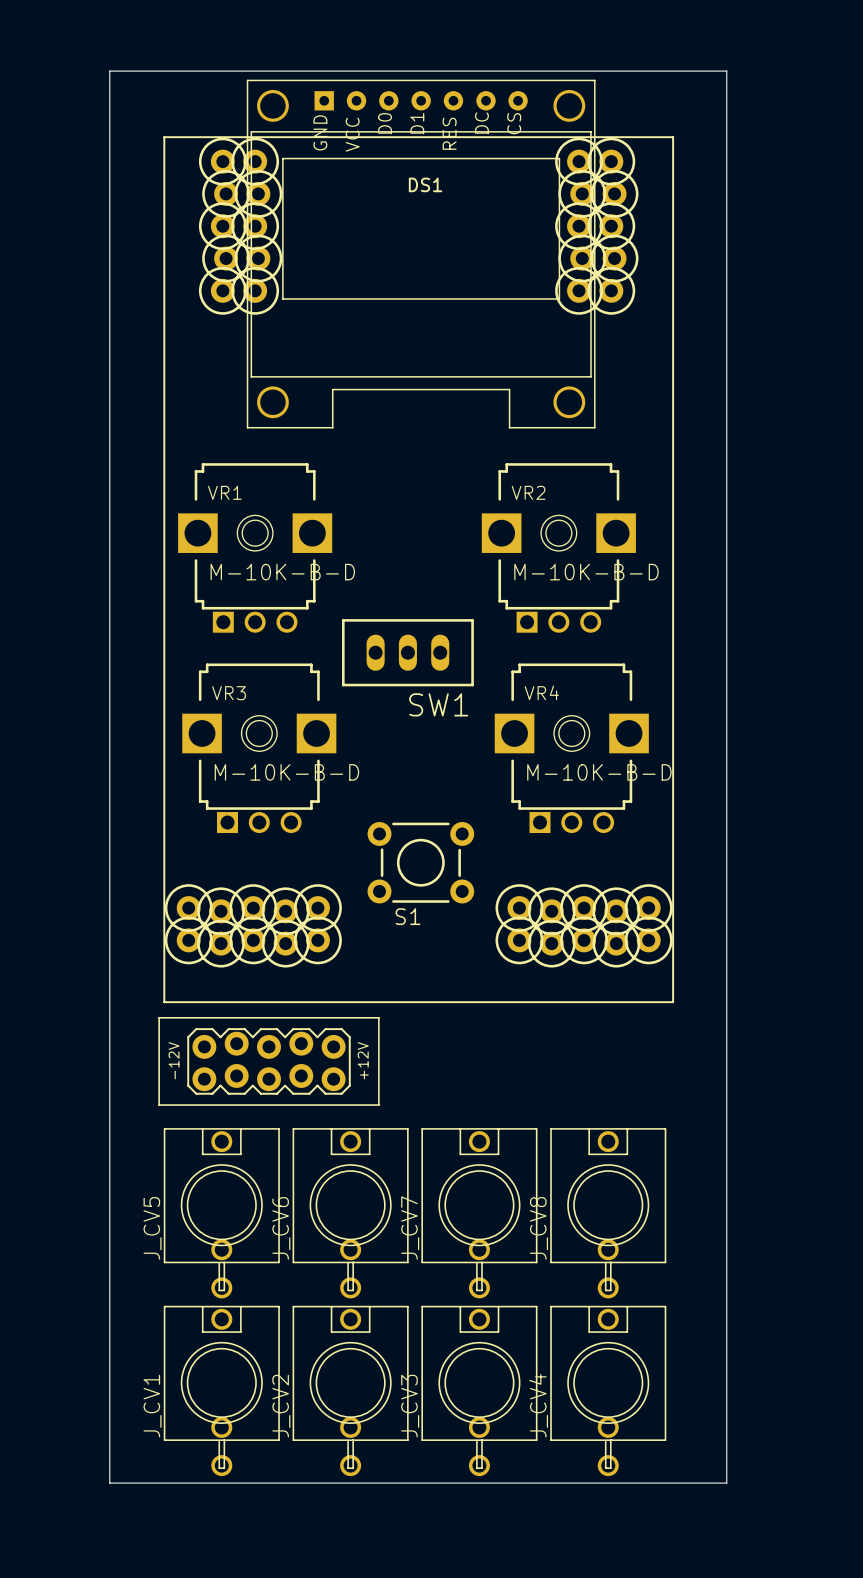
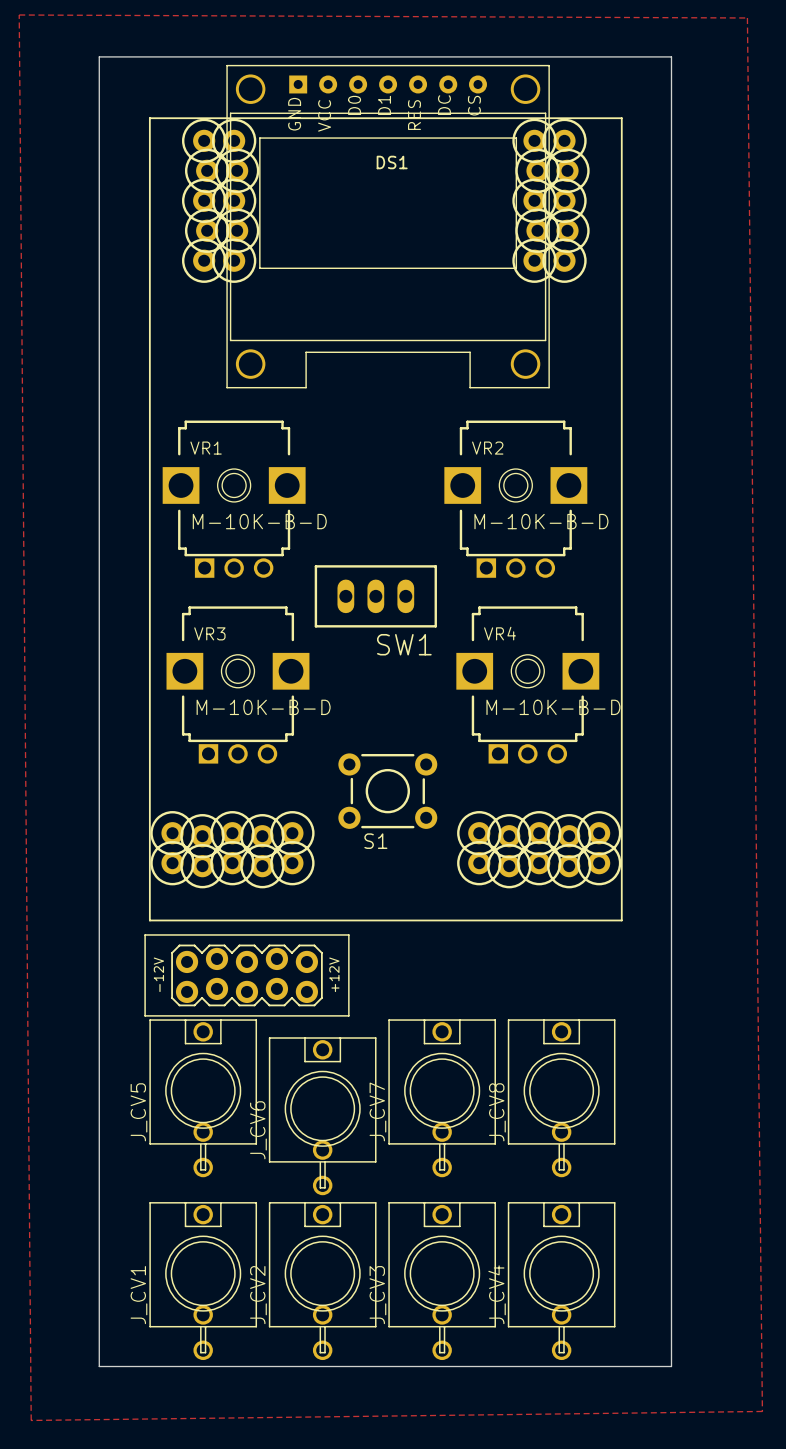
zone outline: none -> (19, 15) (747, 17) (762, 1411) (31, 1420) (19, 15)
J_CV5 position: (221, 1213) -> (203, 1098)
J_CV7 position: (479, 1213) -> (442, 1098)
J_CV8 position: (608, 1213) -> (561, 1098)

